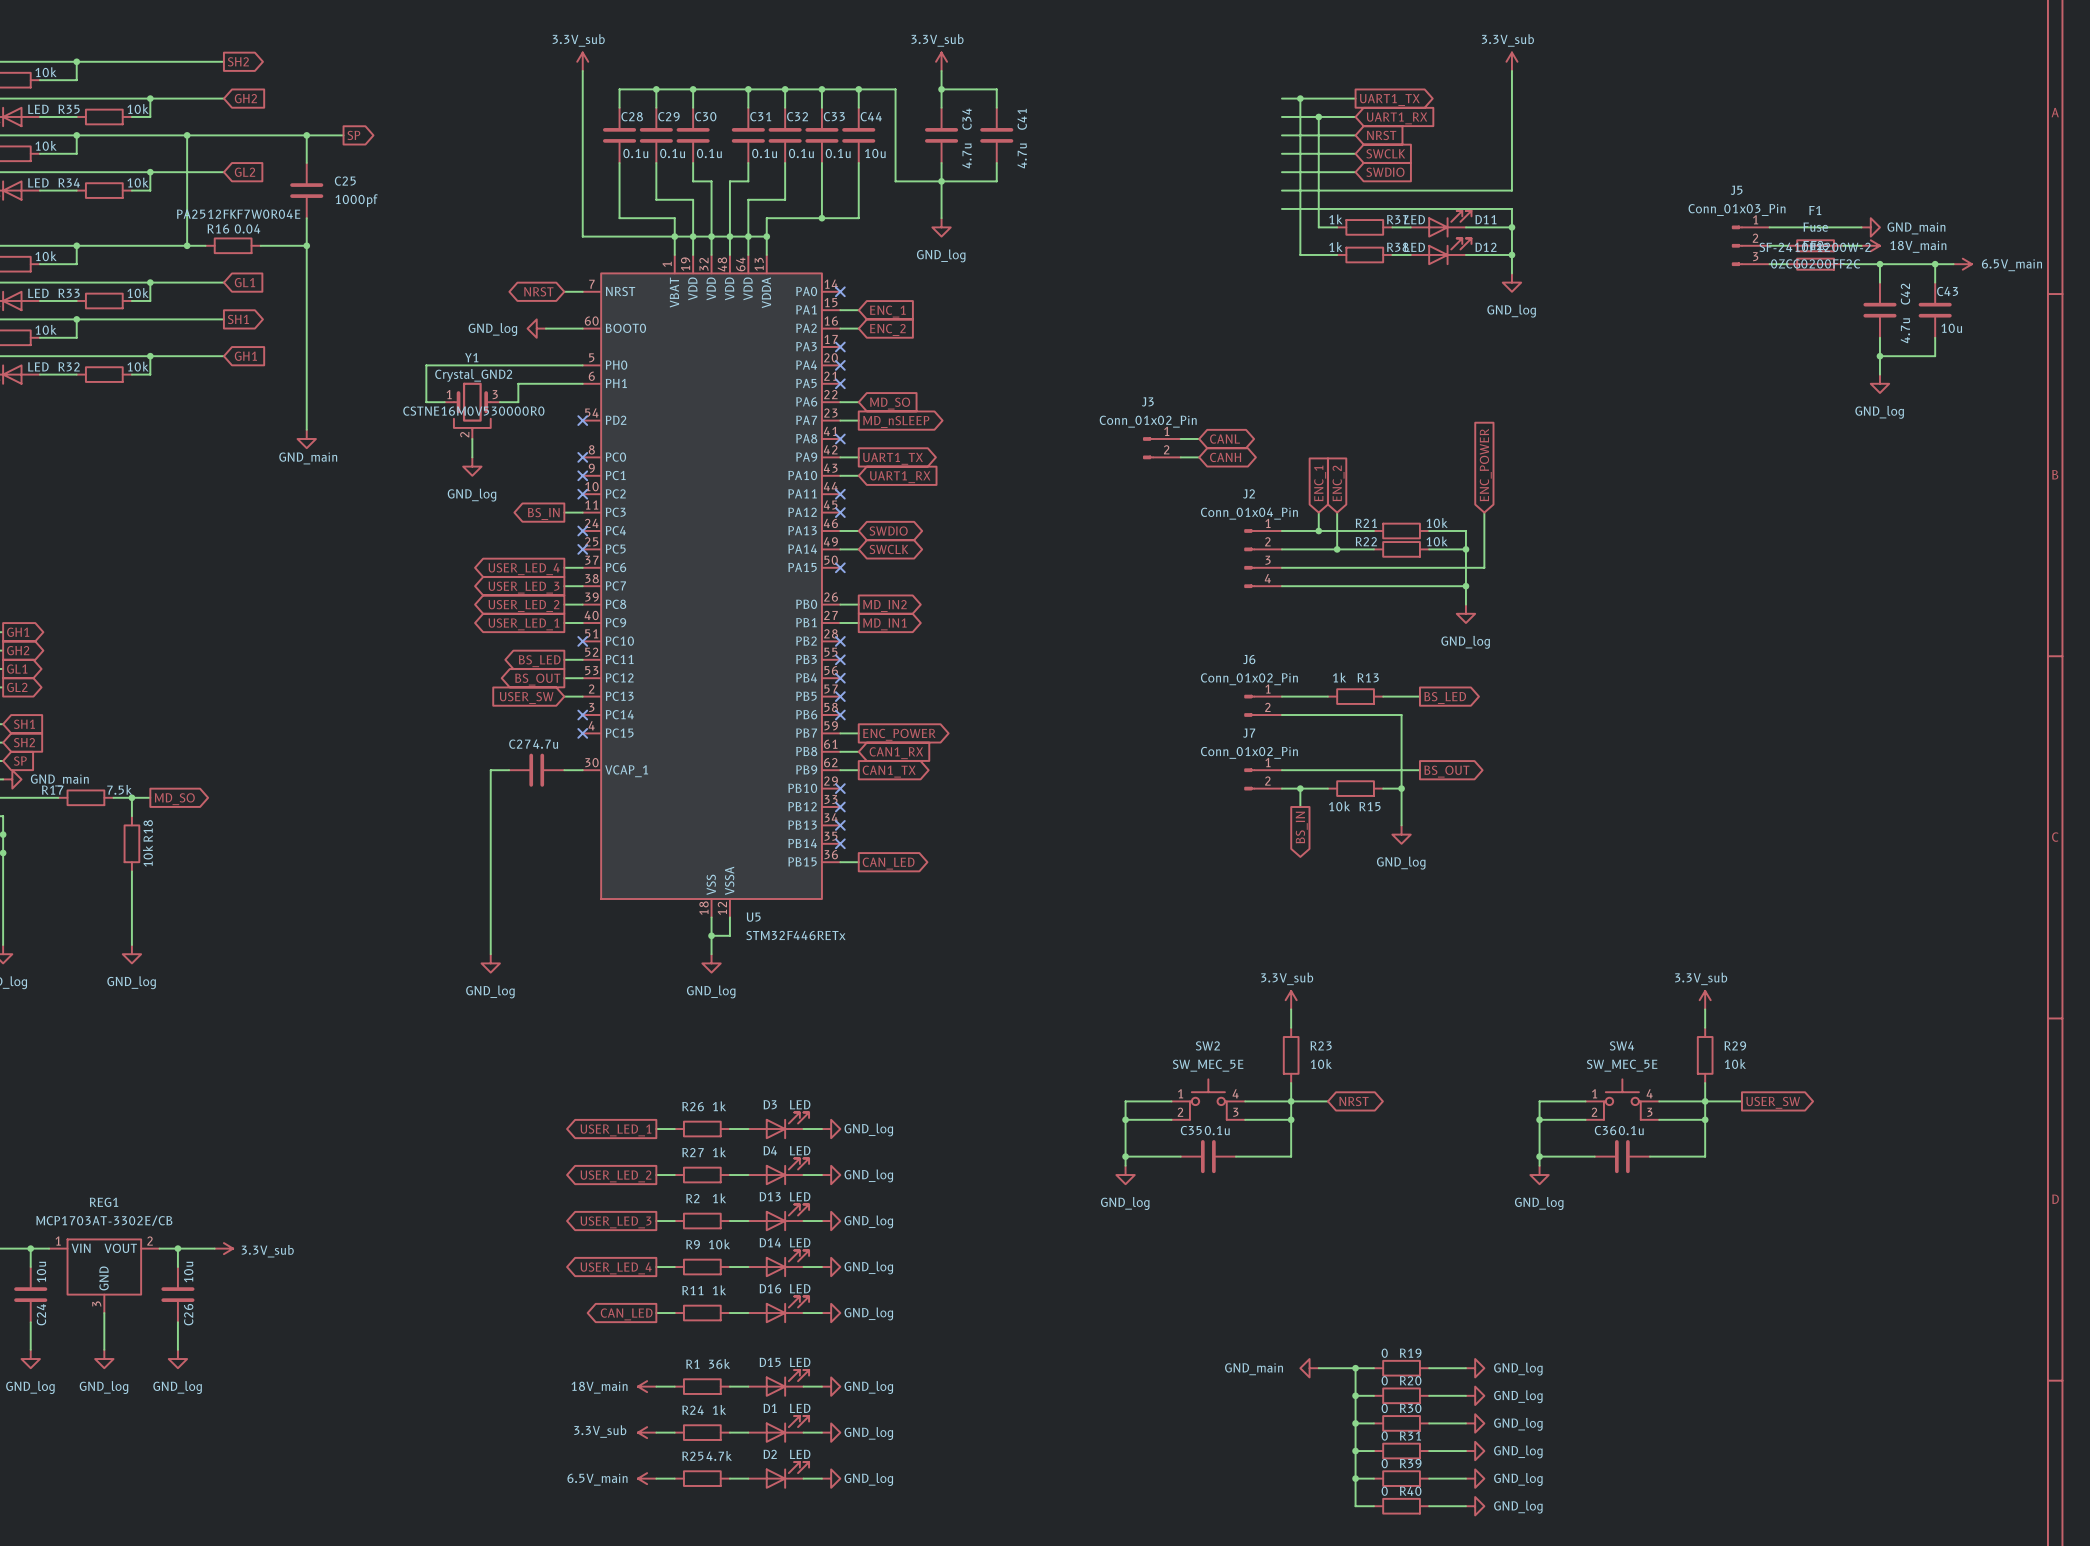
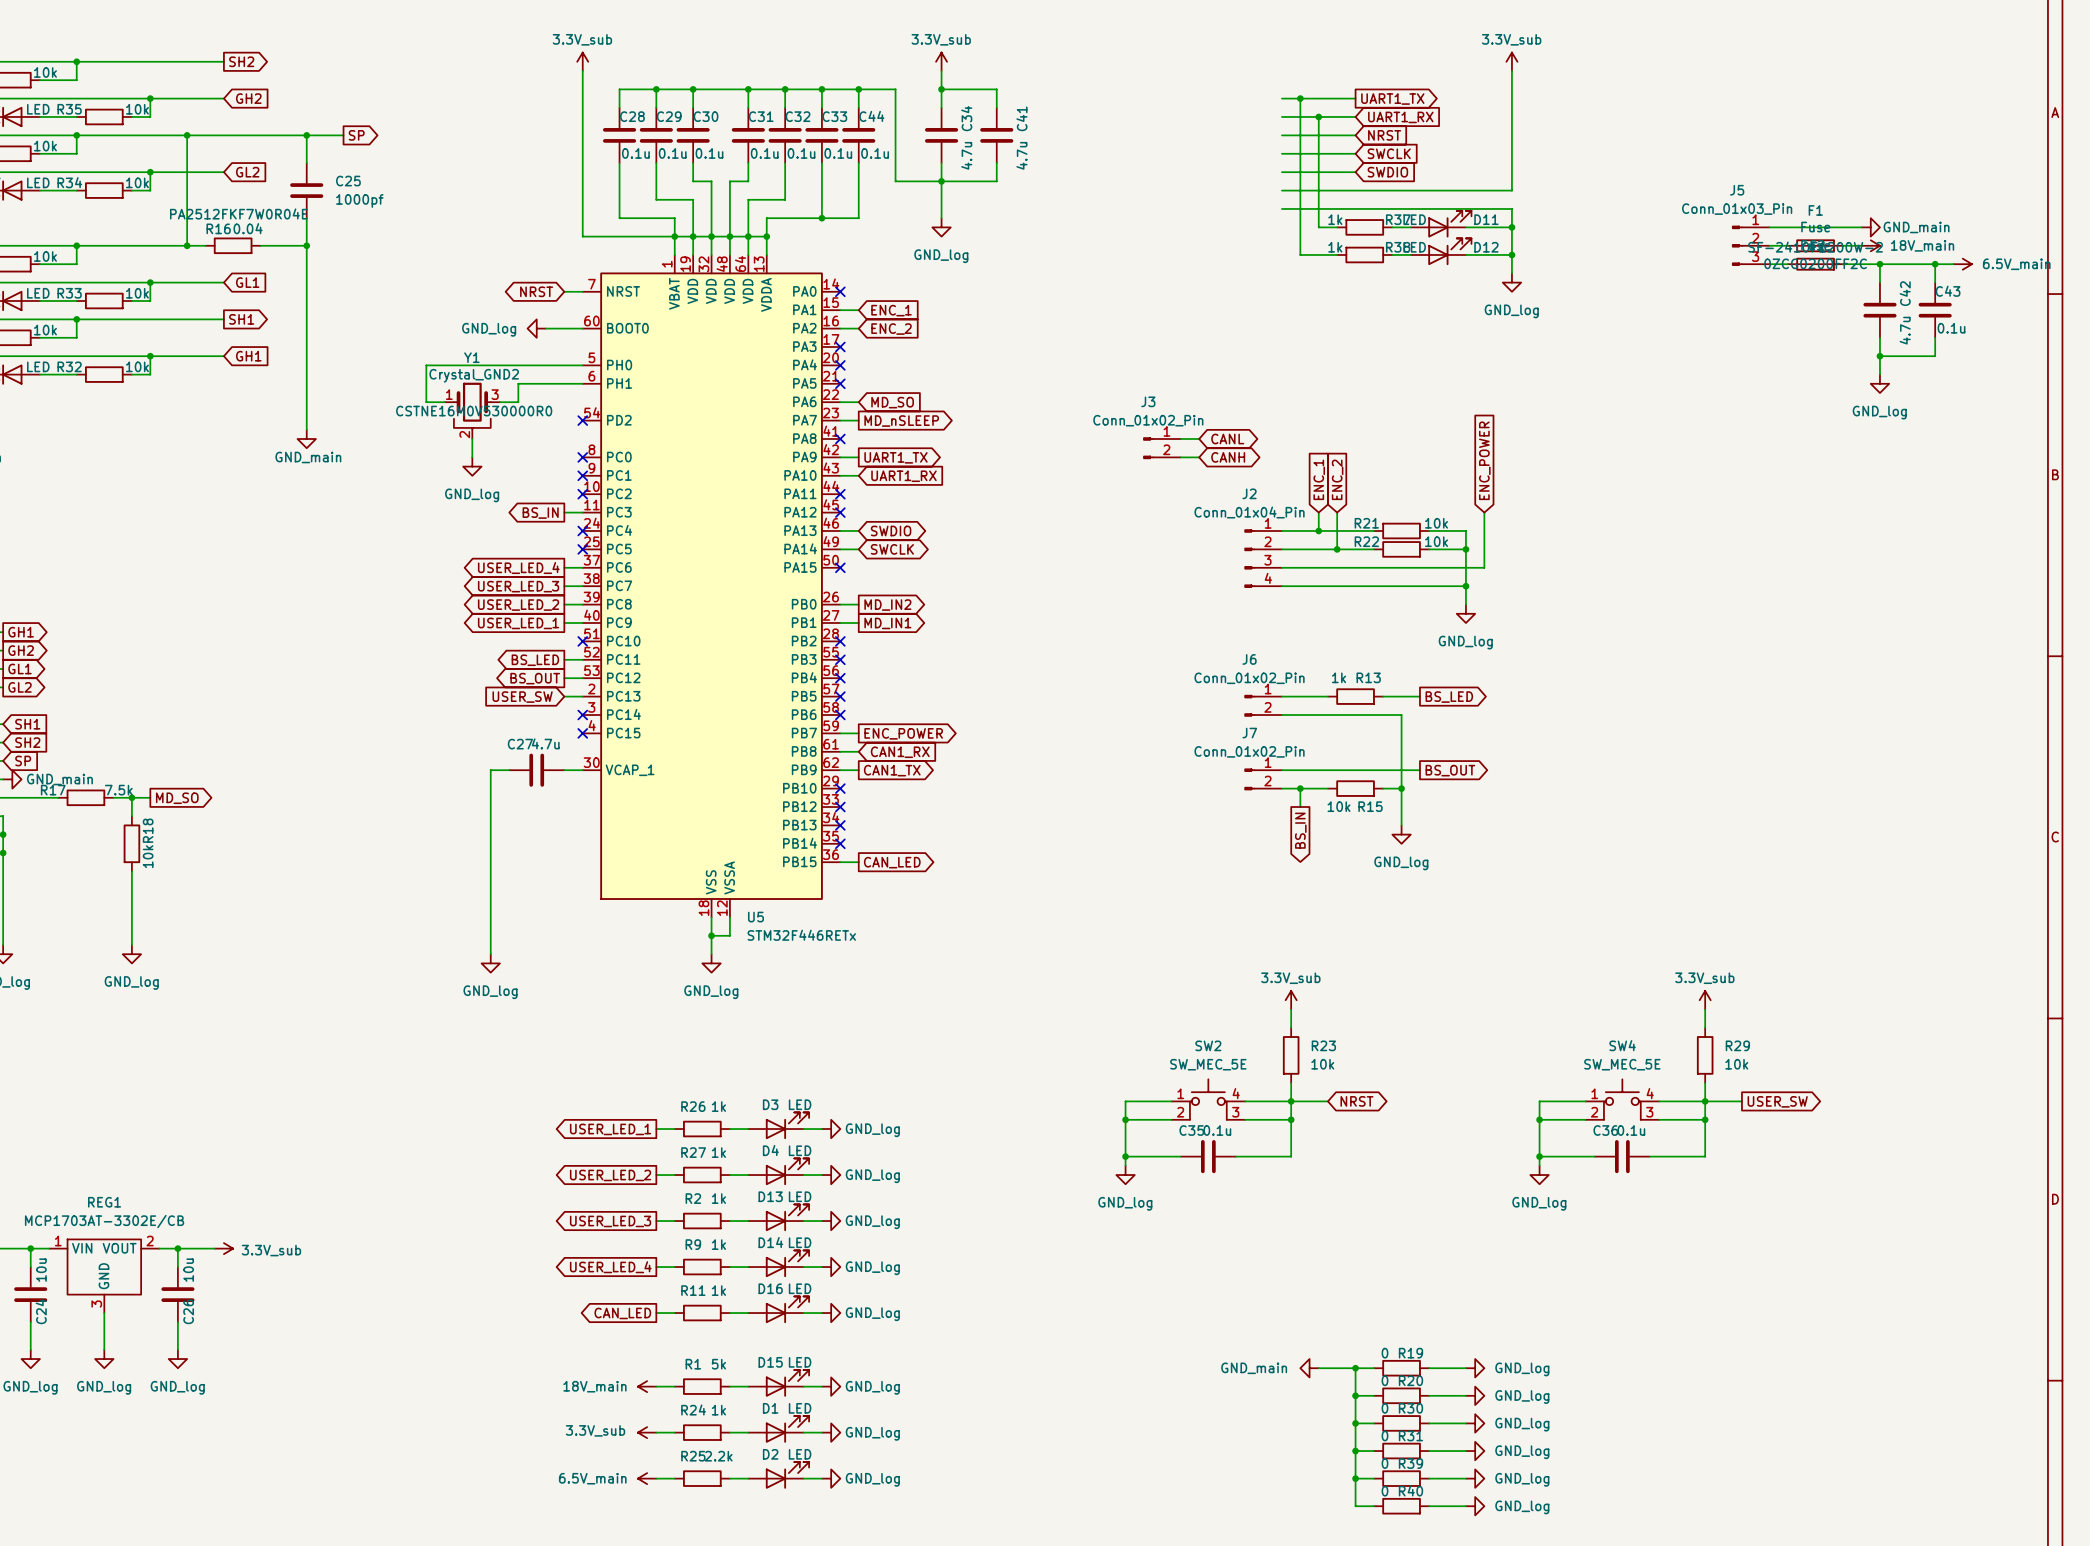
C44 value: 10u (875, 153) -> 0.1u (875, 153)
C43 value: 10u (1951, 328) -> 0.1u (1951, 328)
R9 value: 10k (719, 1244) -> 1k (718, 1244)
R1 value: 36k (719, 1363) -> 5k (718, 1364)
R25 value: 4.7k (719, 1455) -> 2.2k (718, 1456)

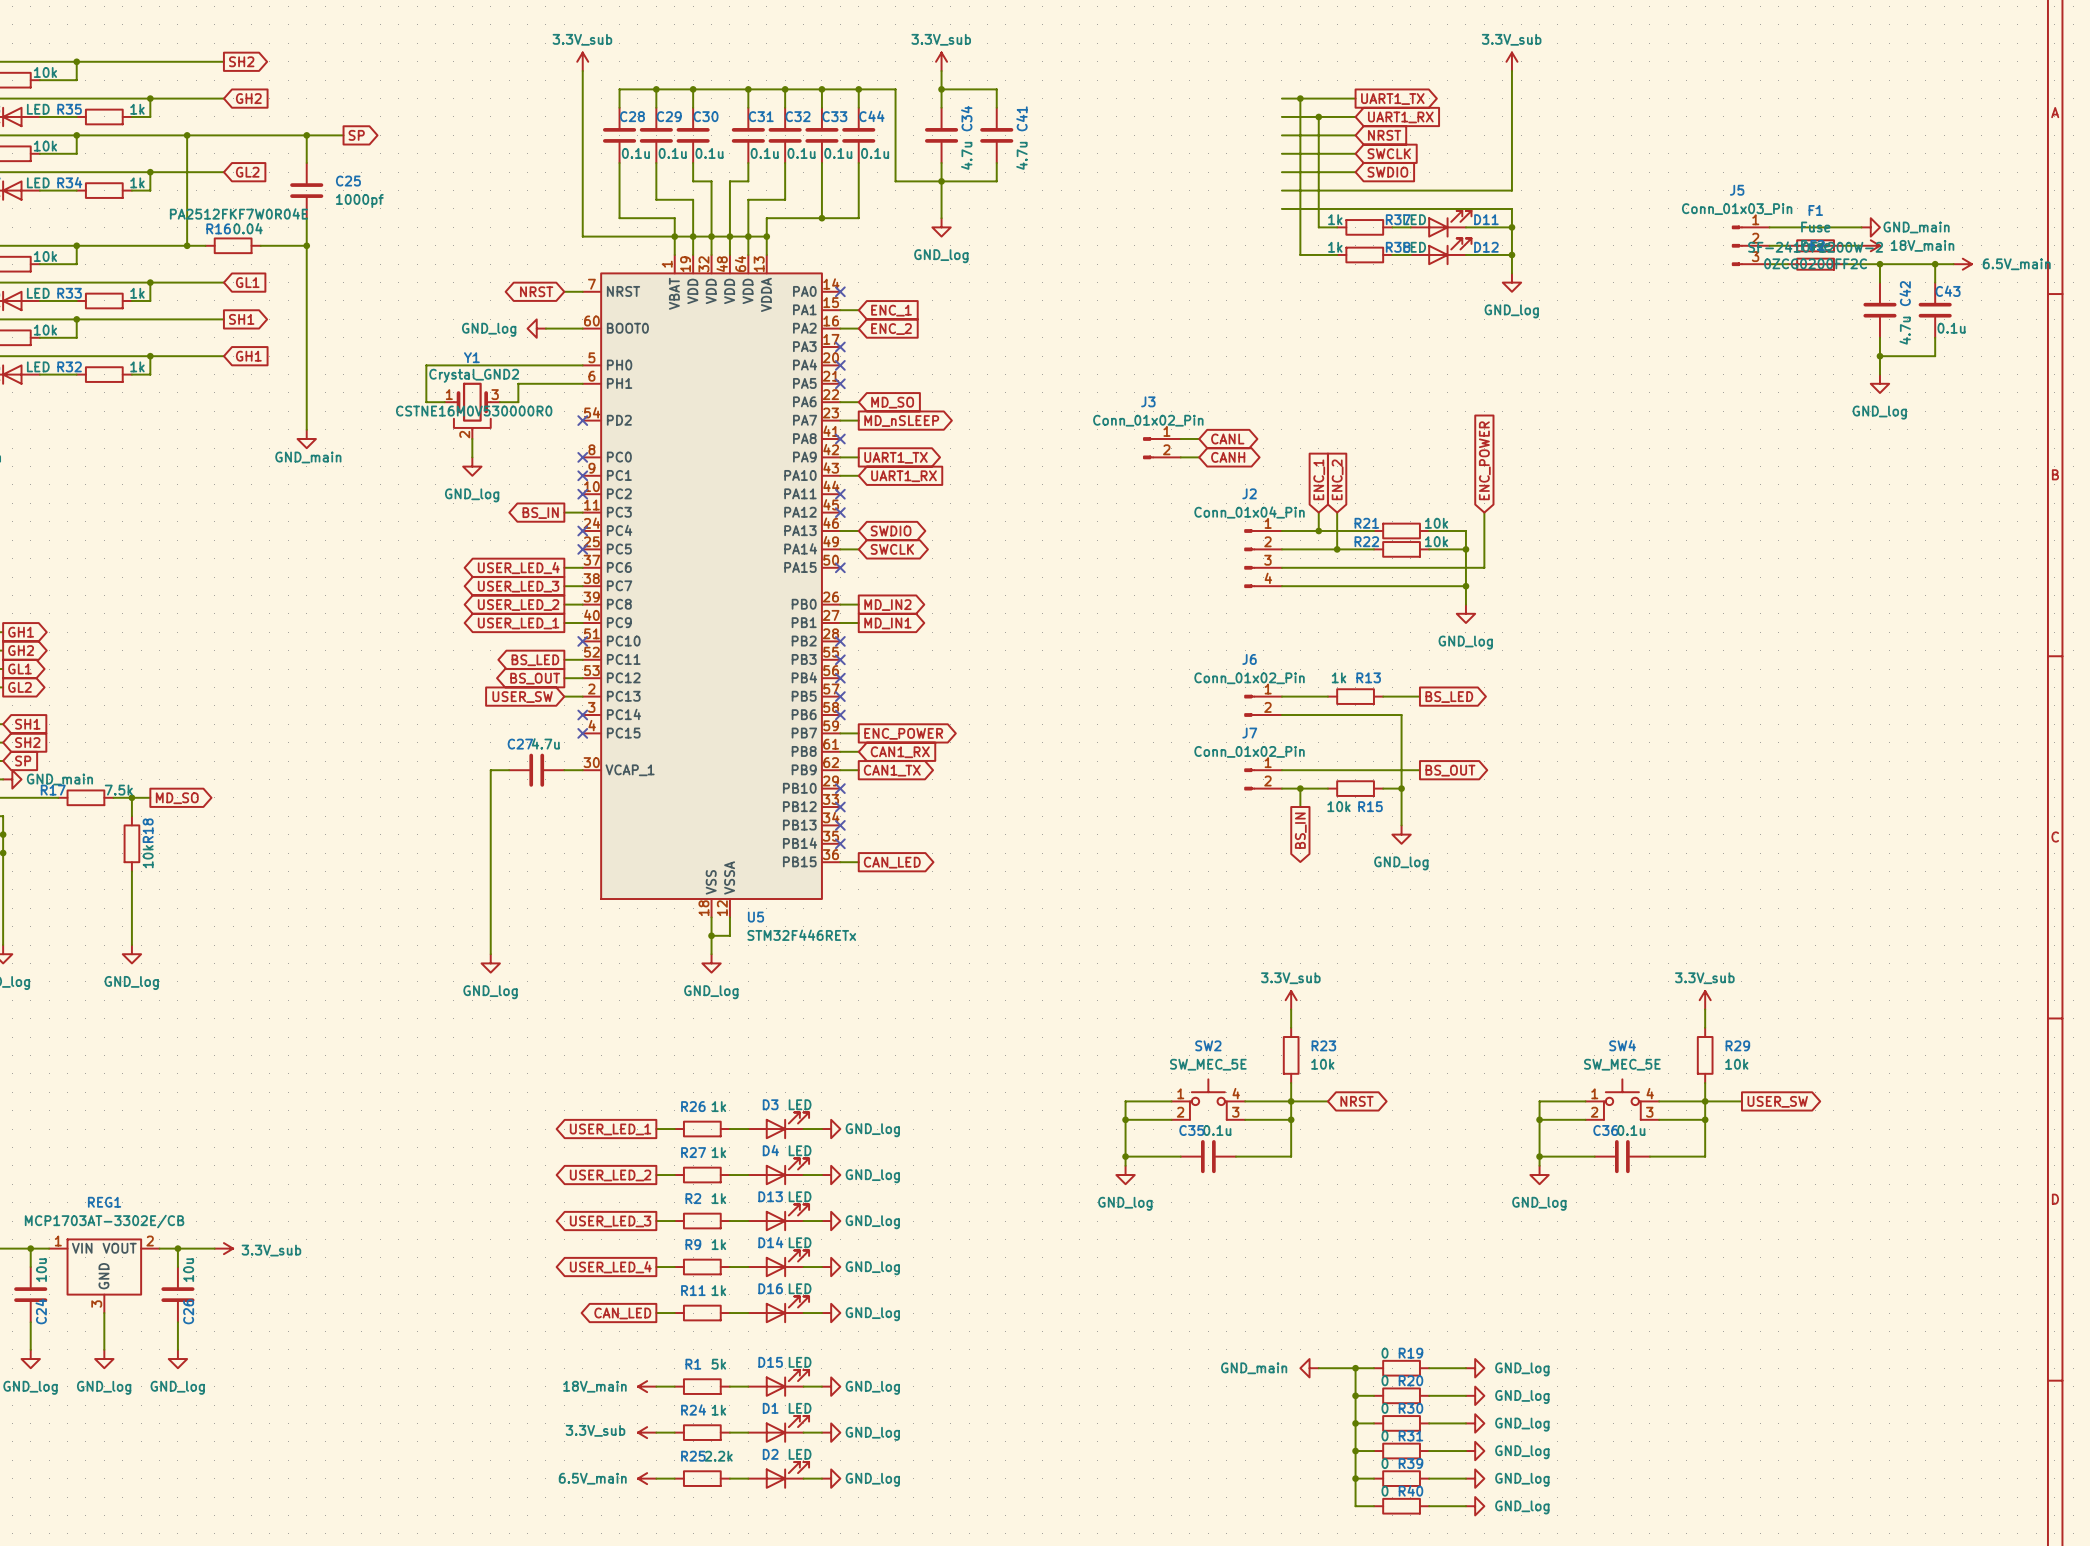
R35 value: 10k (137, 109) -> 1k (137, 109)
R34 value: 10k (137, 182) -> 1k (137, 182)
R33 value: 10k (137, 293) -> 1k (137, 293)
R32 value: 10k (137, 366) -> 1k (137, 366)

